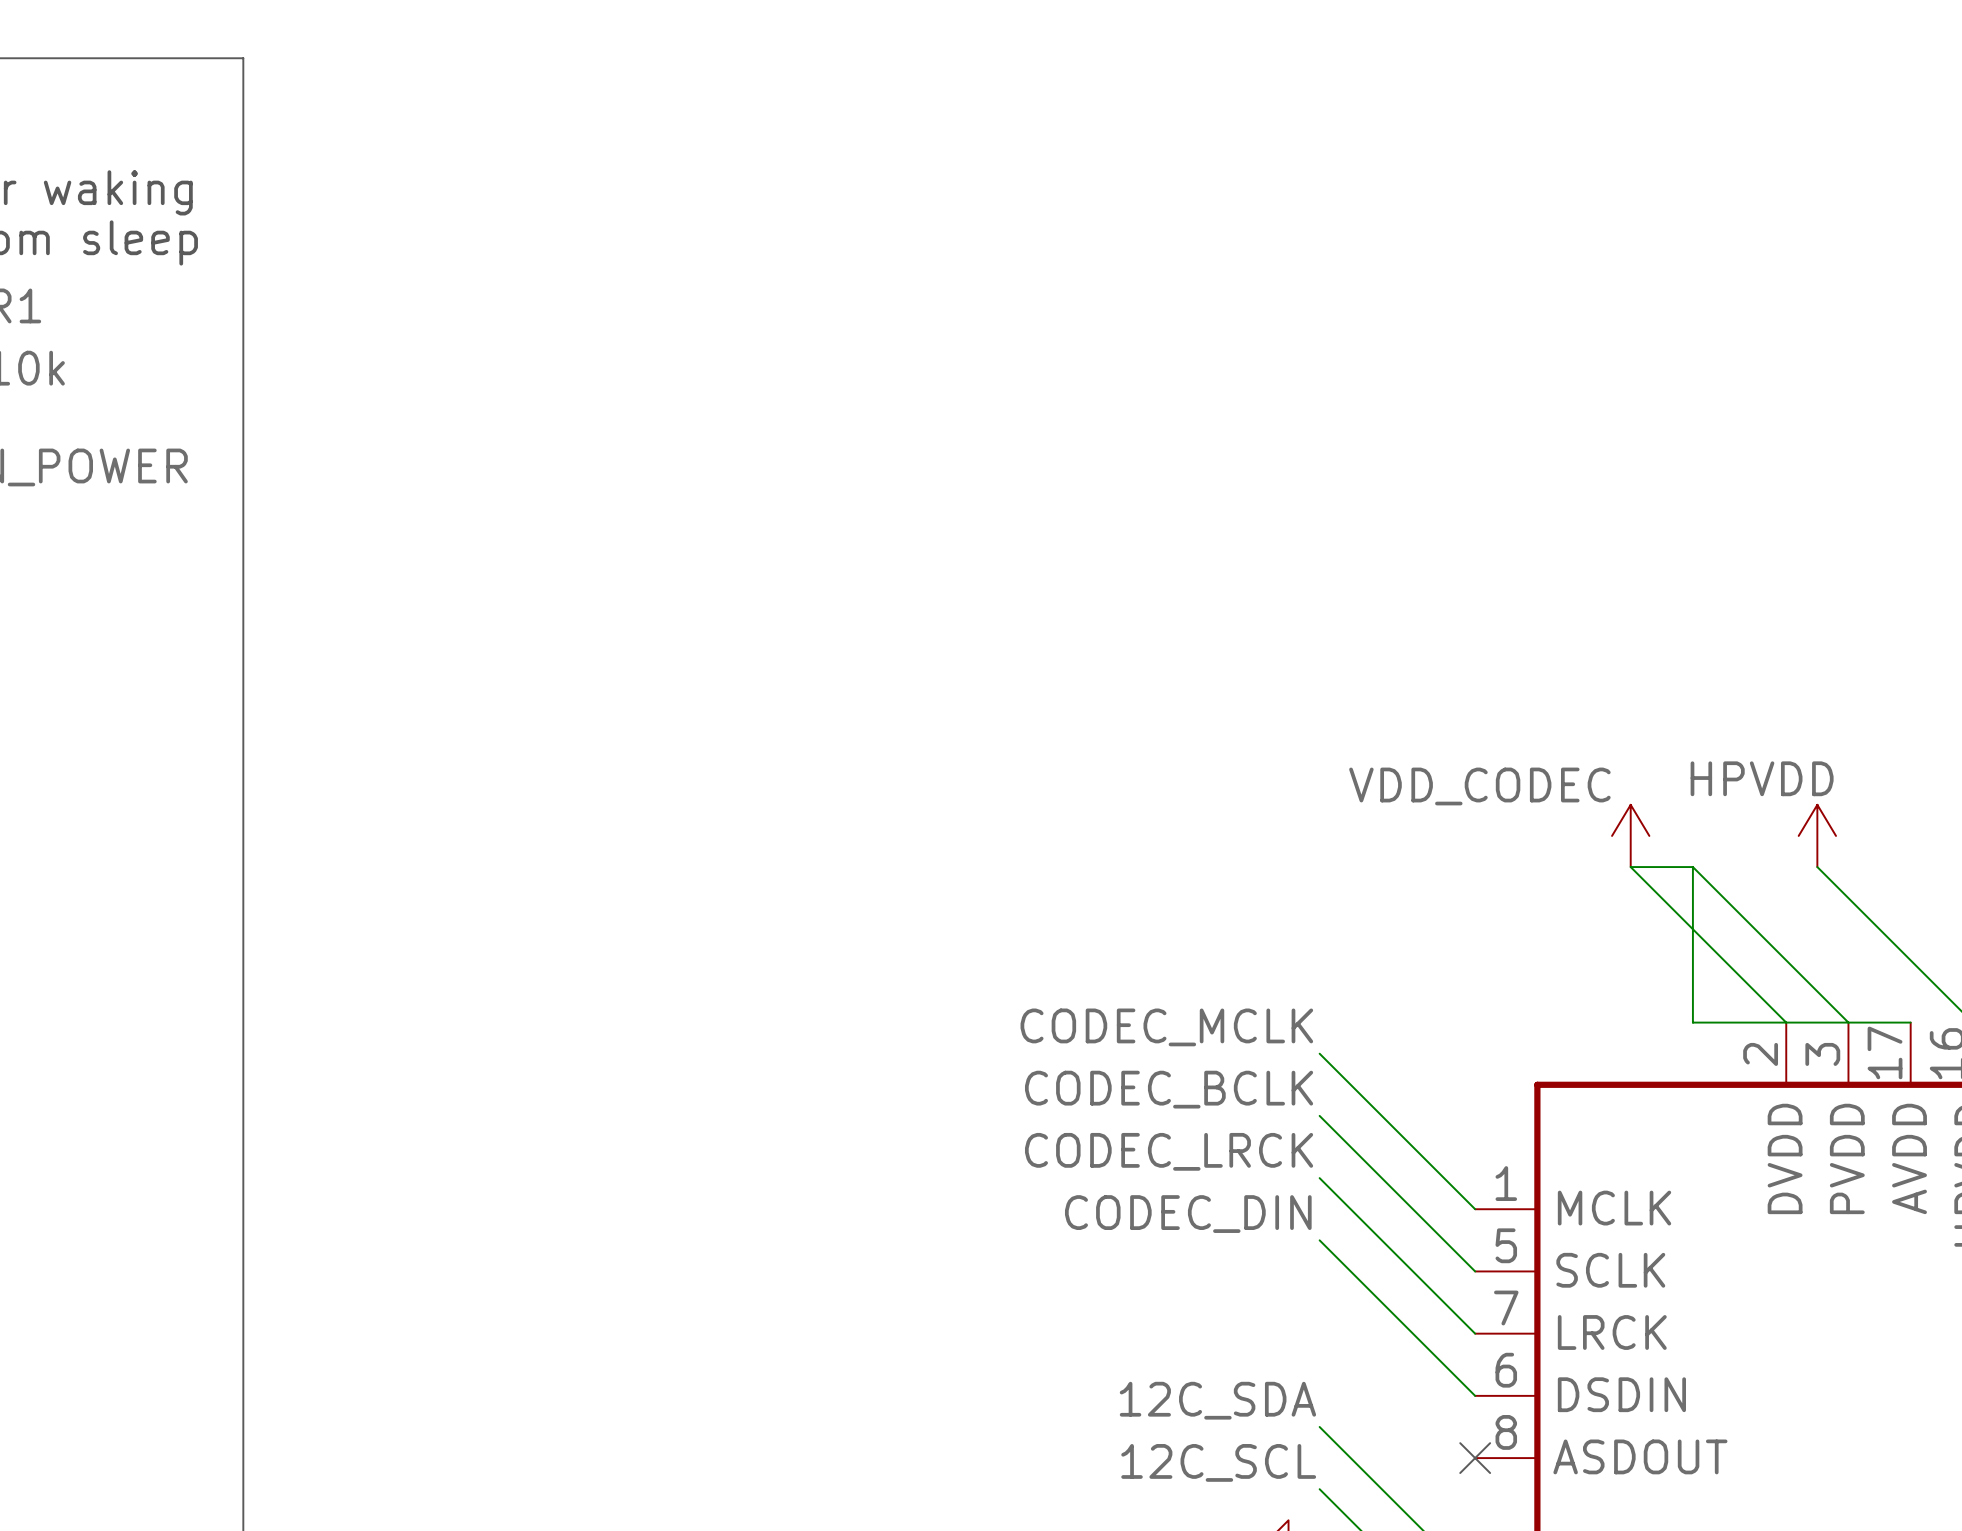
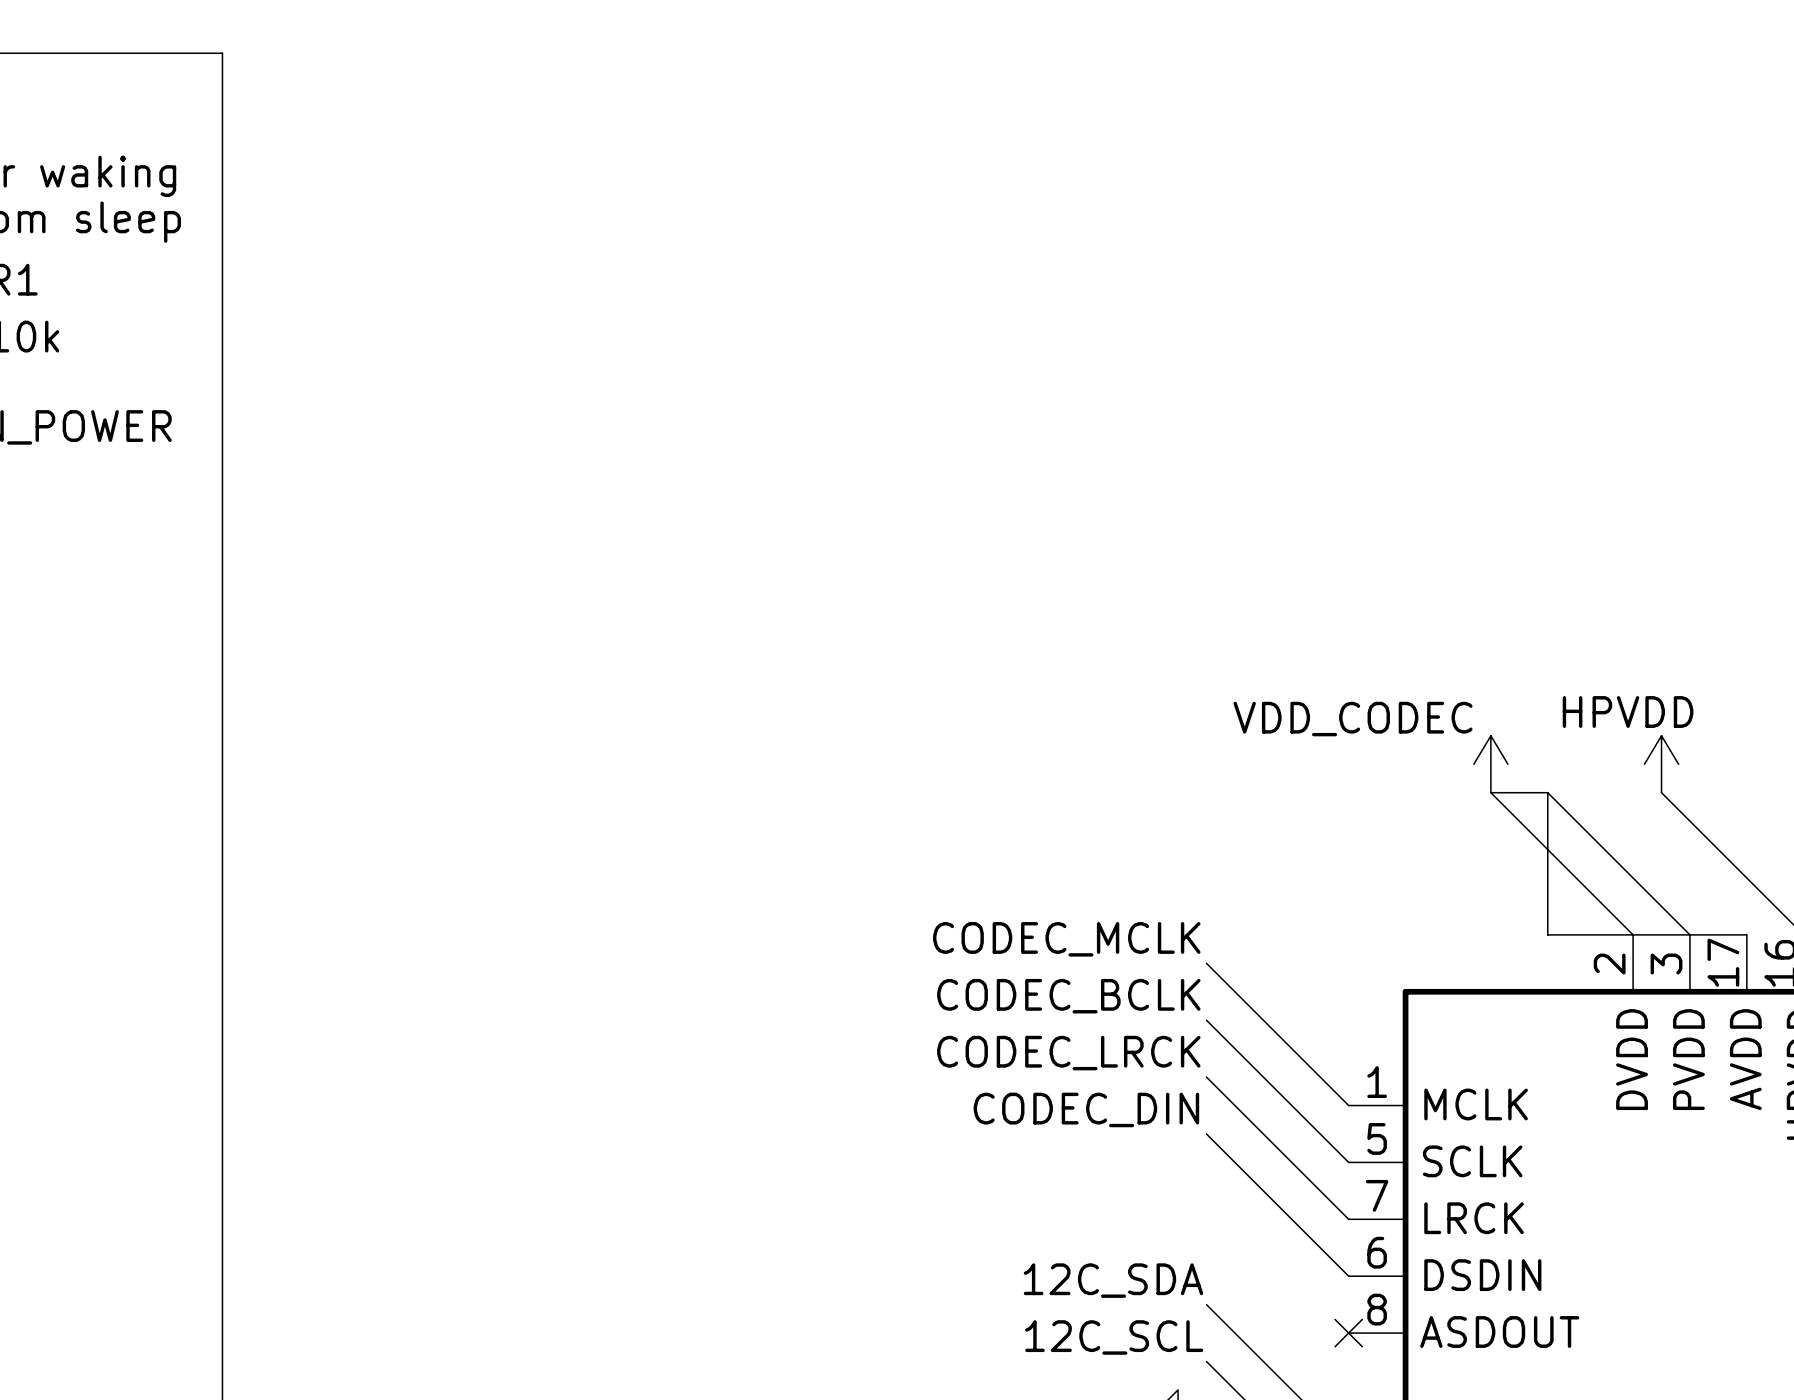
power symbol text position: HPVDD (1762, 778) -> HPVDD (1628, 712)

